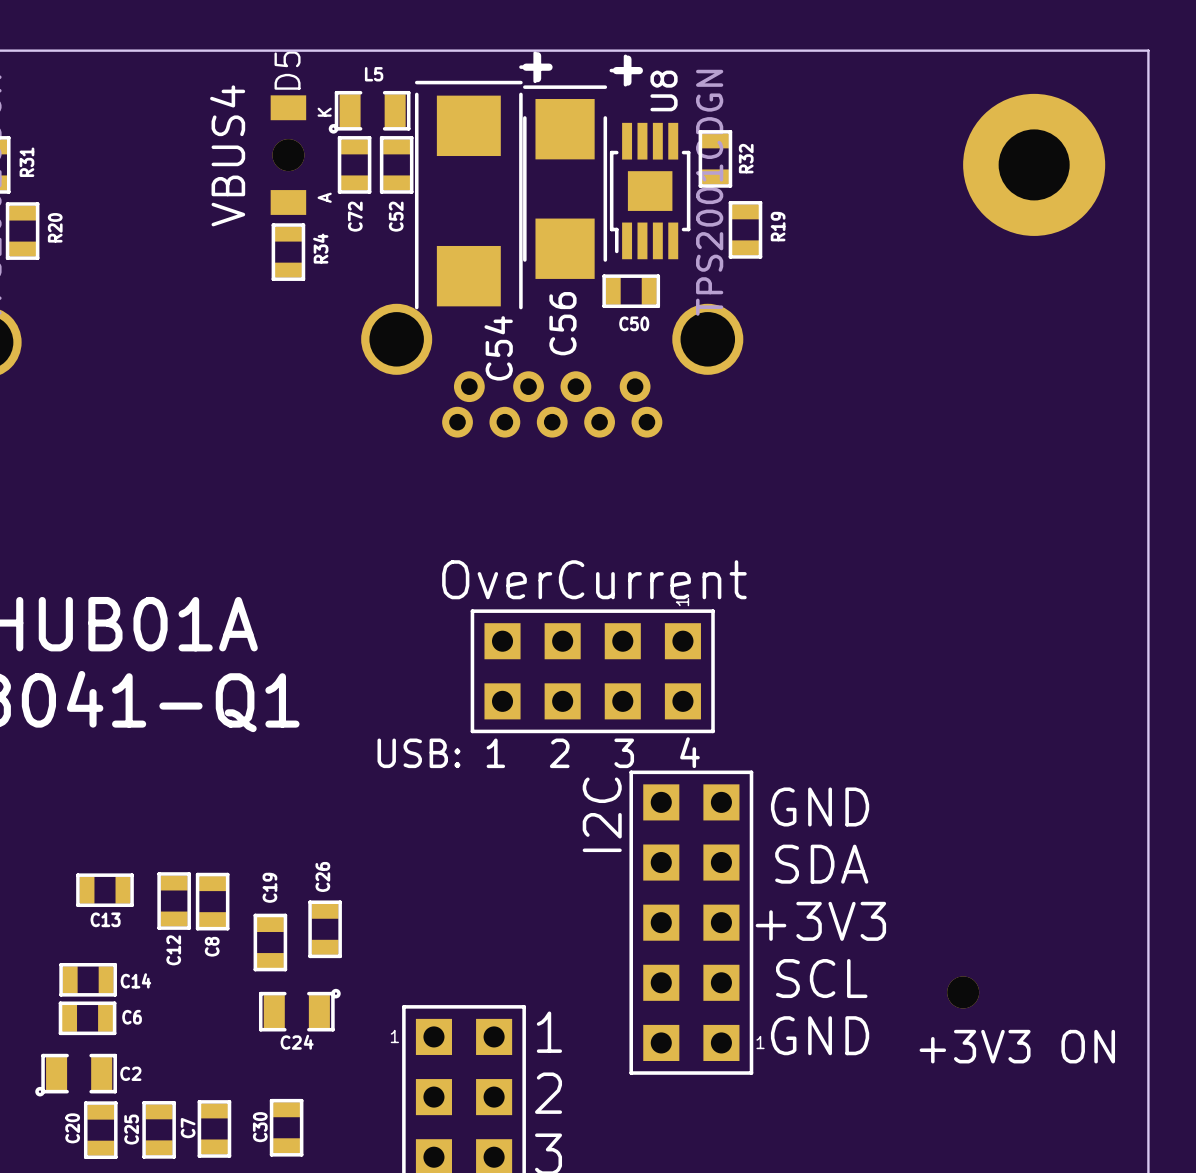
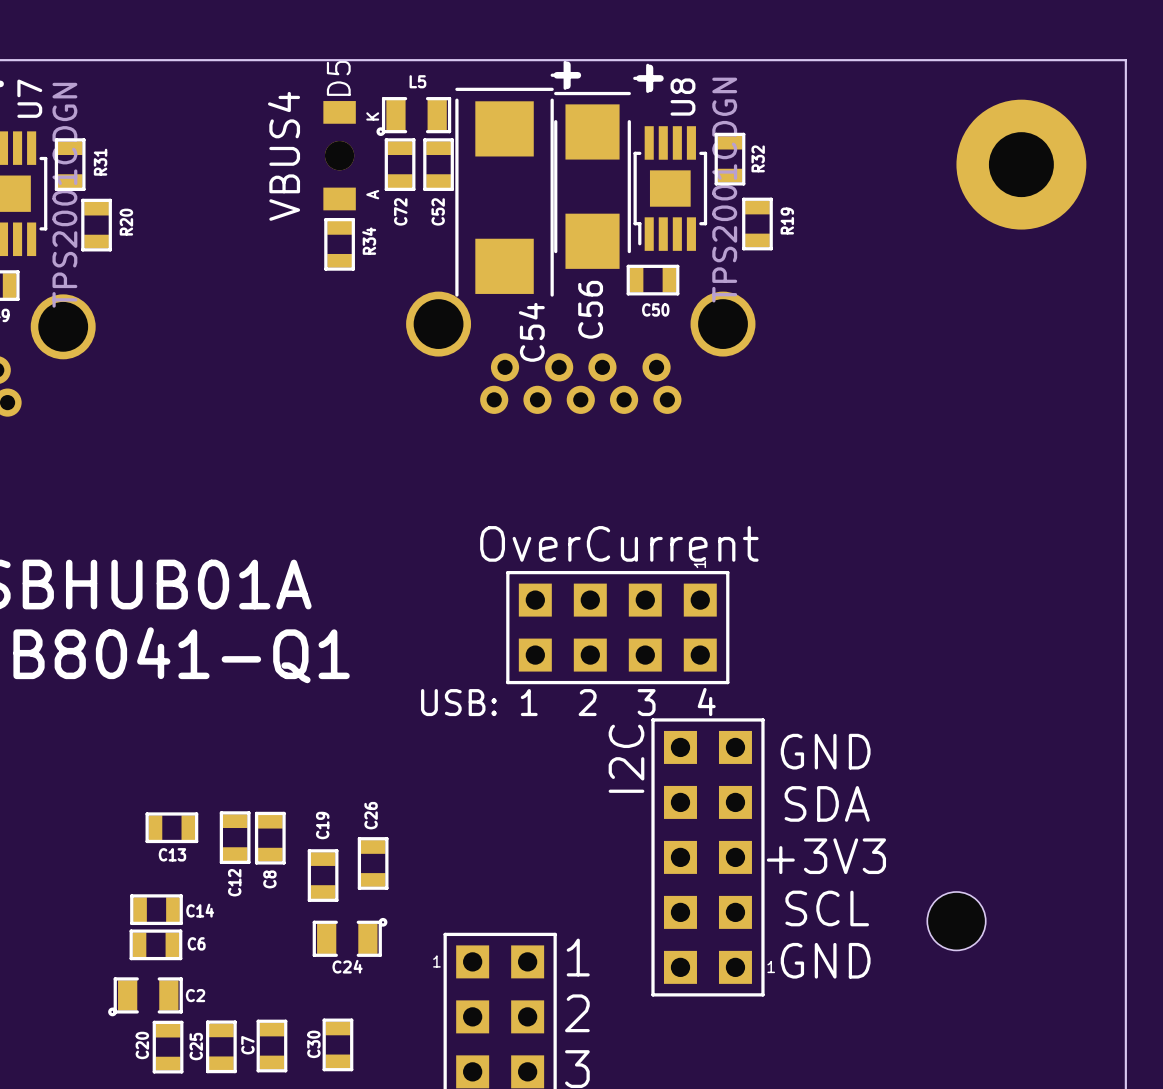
part footprint: [947, 976, 980, 1009] -> [927, 891, 986, 951]
part value: +3V3 ON (1017, 1046) -> none

